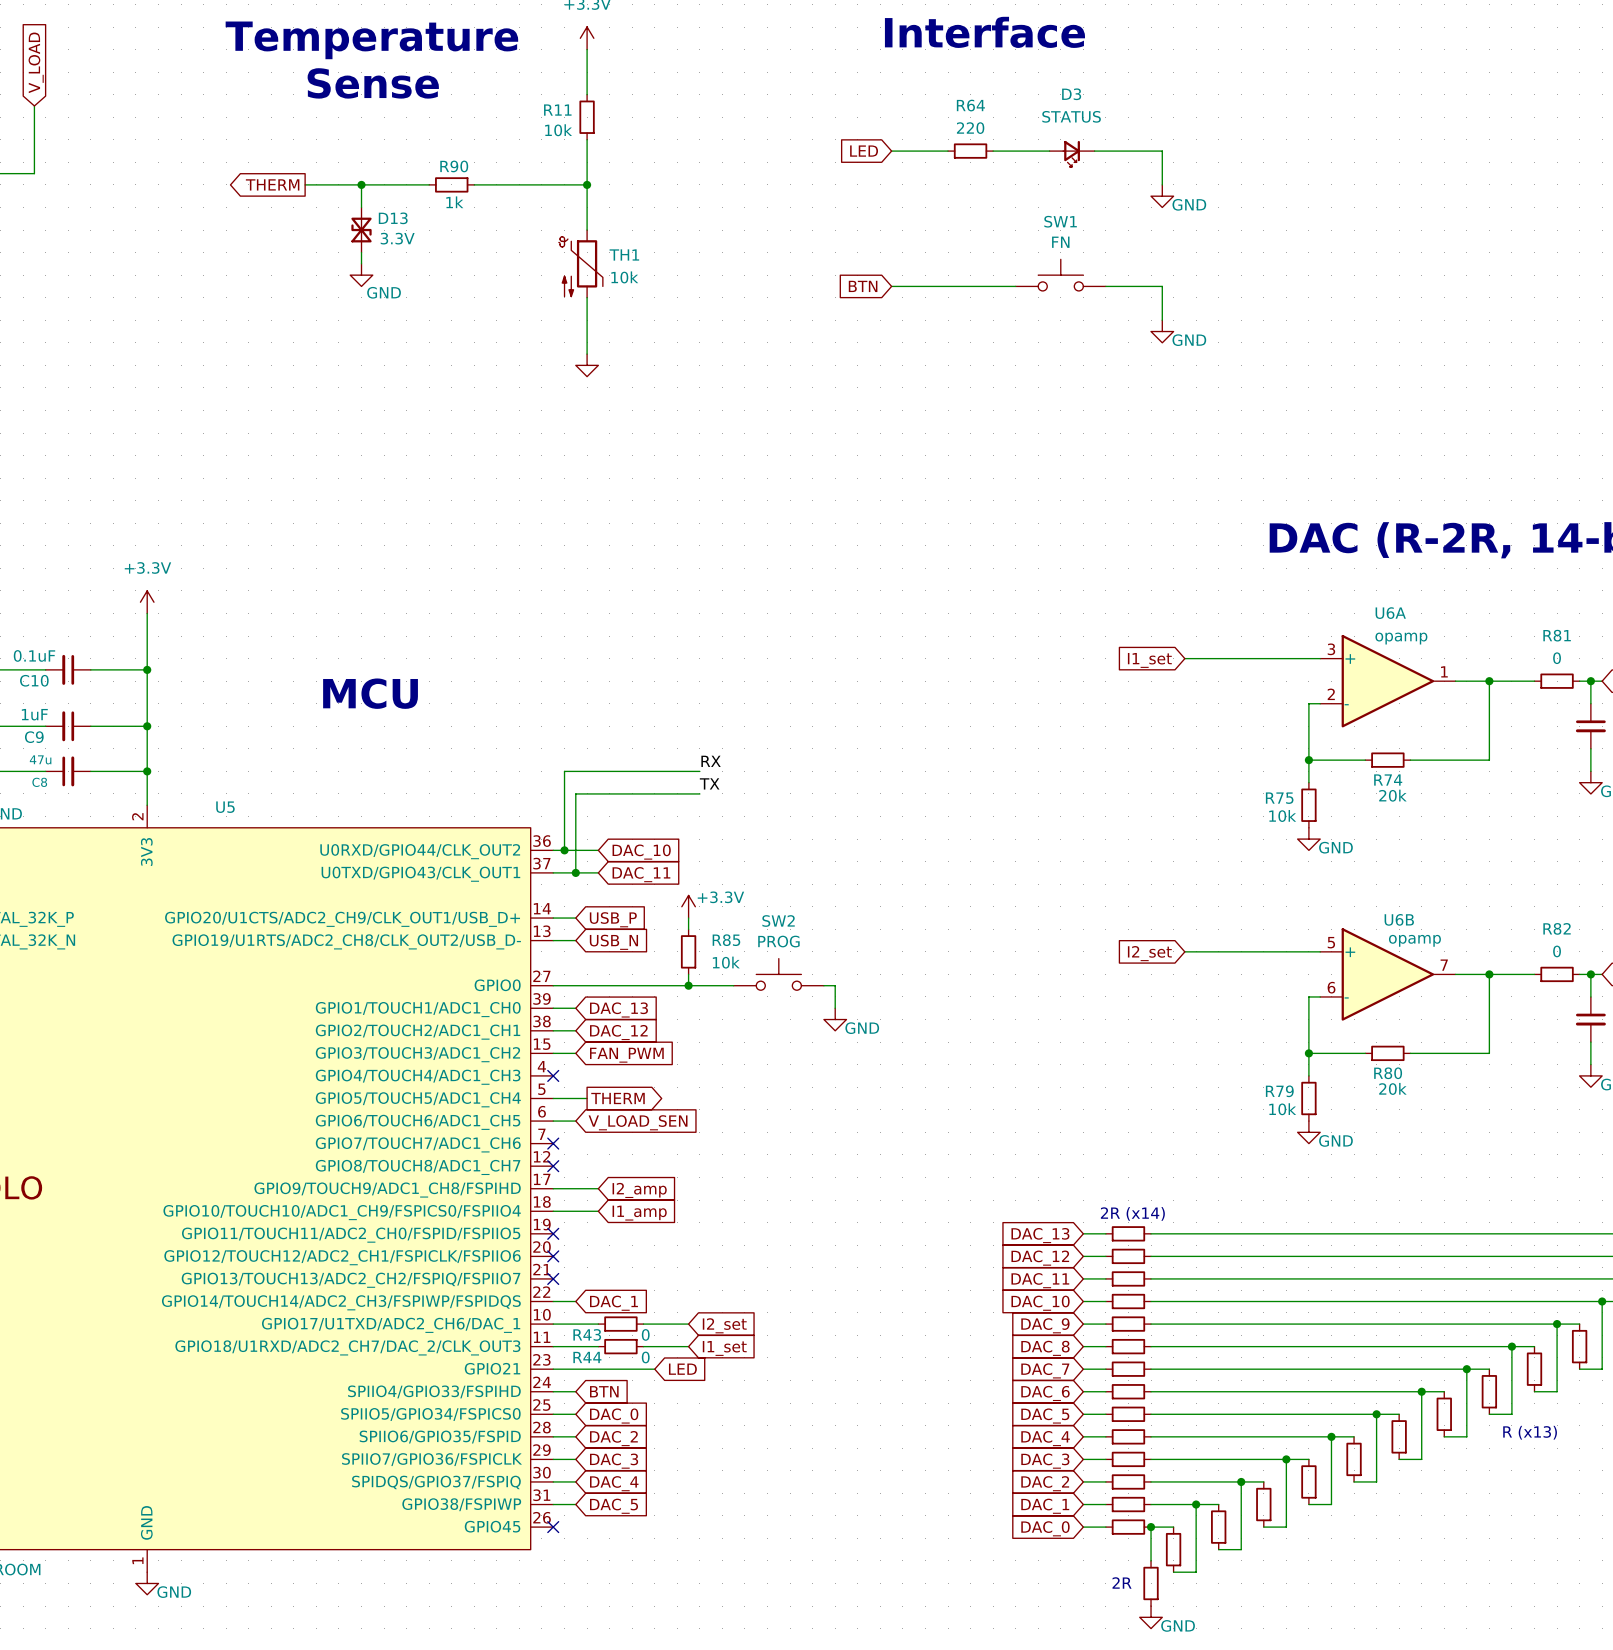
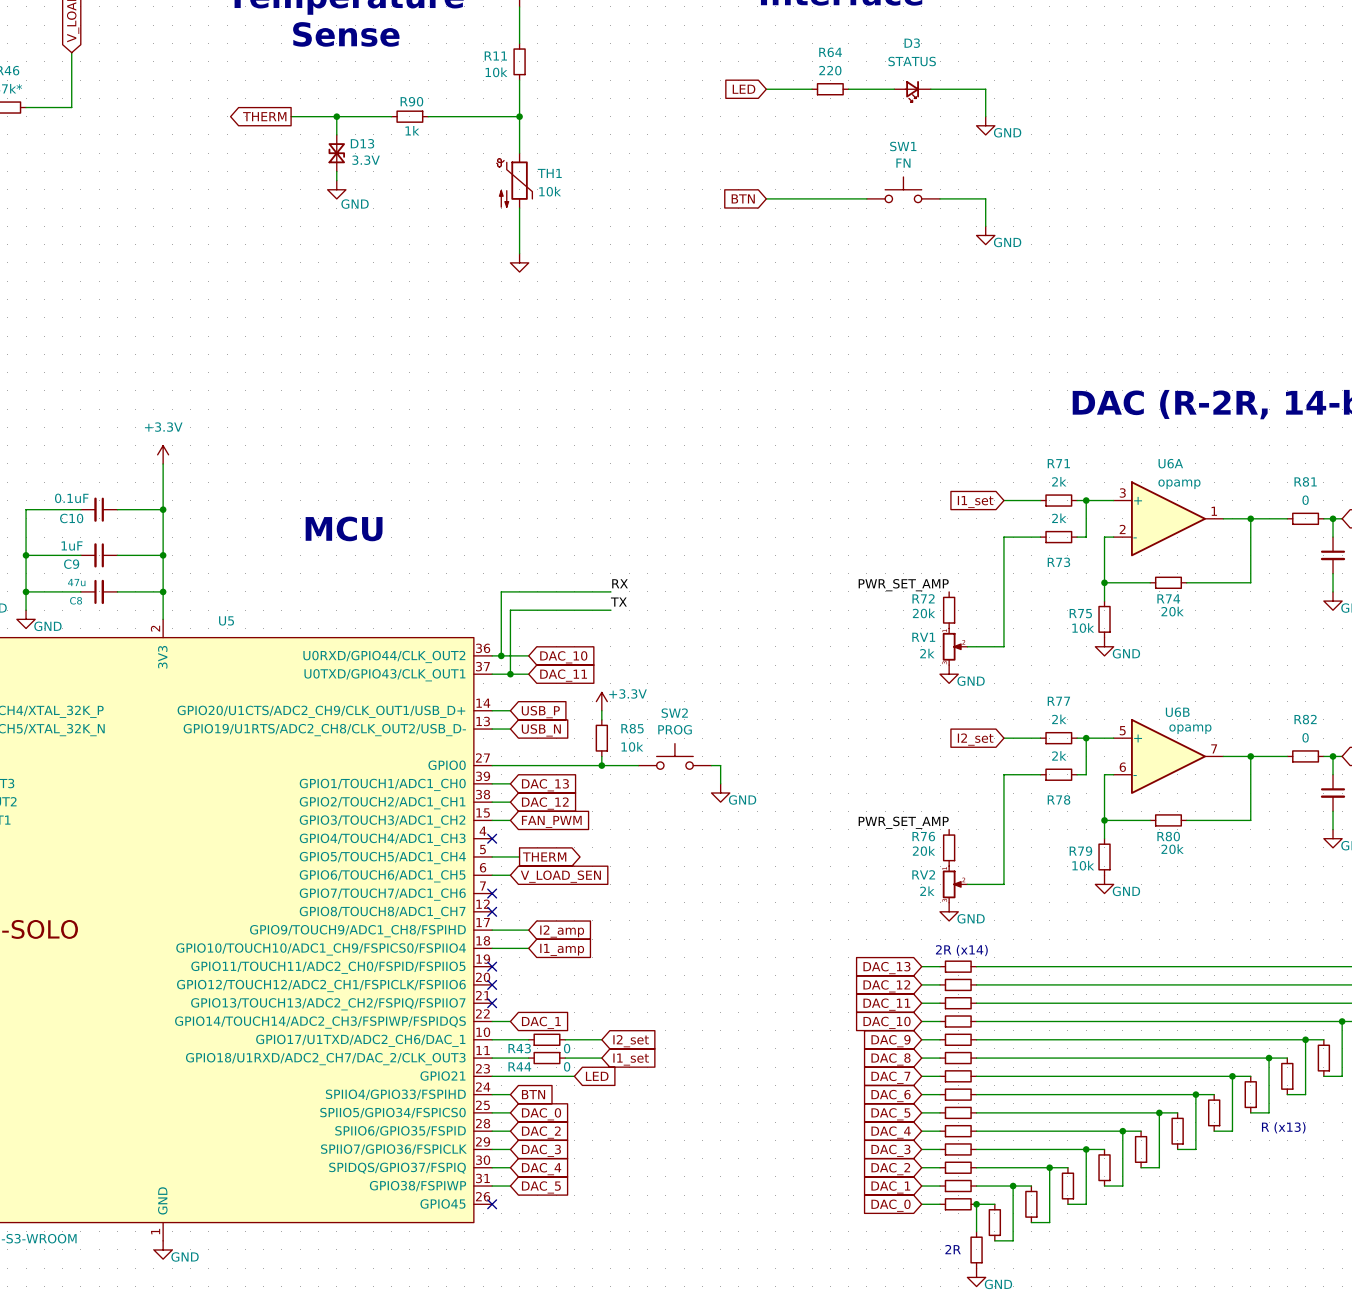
wire: (1229, 658) (1275, 658) -> none
R71: none -> 2k (1058, 500)
wire: none -> (1086, 500) (1086, 537) (1077, 537)
junction: none -> (1086, 500)
wire: none -> (1040, 537) (1003, 537) (1003, 646) (967, 646)
R73: none -> 2k (1058, 537)
label: none -> PWR_SET_AMP (903, 585)
R72: none -> 20k (949, 610)
RV1: none -> 2k (955, 646)
power symbol: none -> GND (949, 674)
wire: (1229, 951) (1275, 951) -> none
R77: none -> 2k (1058, 738)
wire: none -> (1086, 738) (1086, 774) (1077, 774)
junction: none -> (1086, 738)
wire: none -> (1040, 774) (1003, 774) (1003, 884) (967, 884)
R78: none -> 2k (1058, 774)
label: none -> PWR_SET_AMP (903, 822)
R76: none -> 20k (949, 847)
RV2: none -> 2k (955, 884)
power symbol: none -> GND (949, 911)

